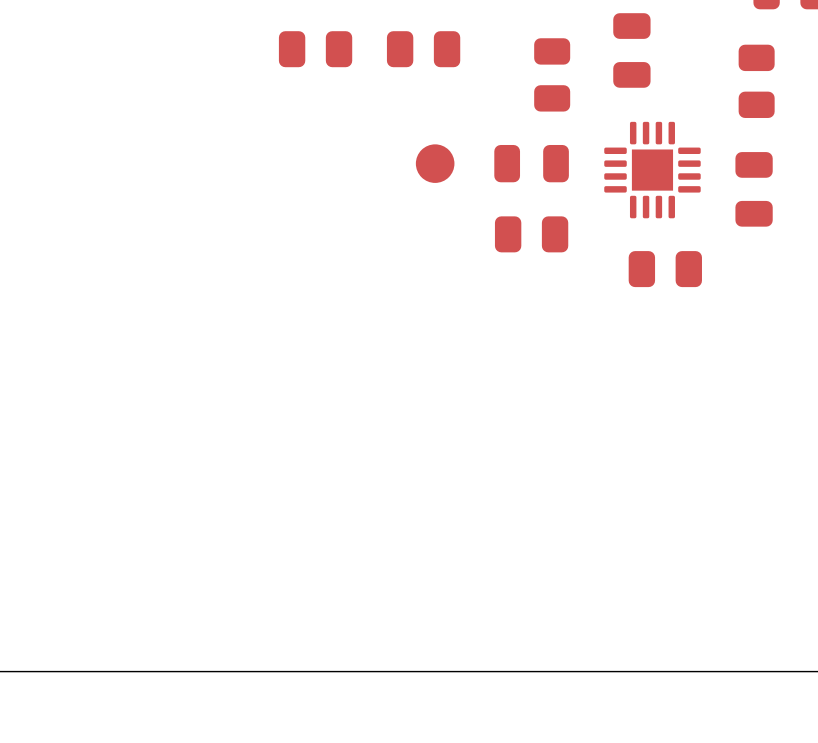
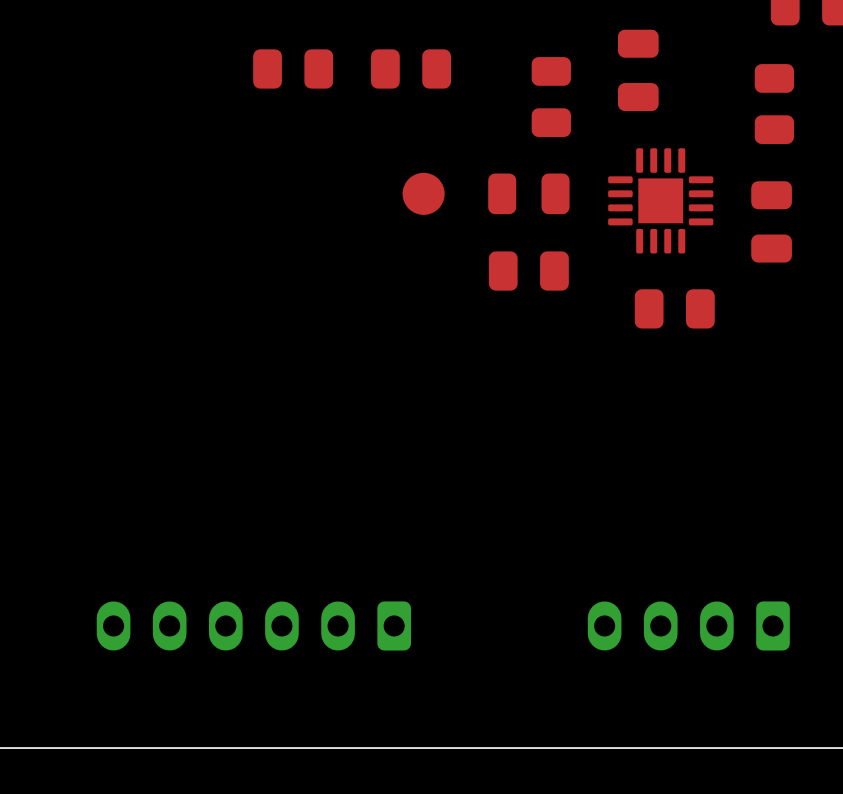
part: none -> (253, 625)
part: none -> (688, 625)

